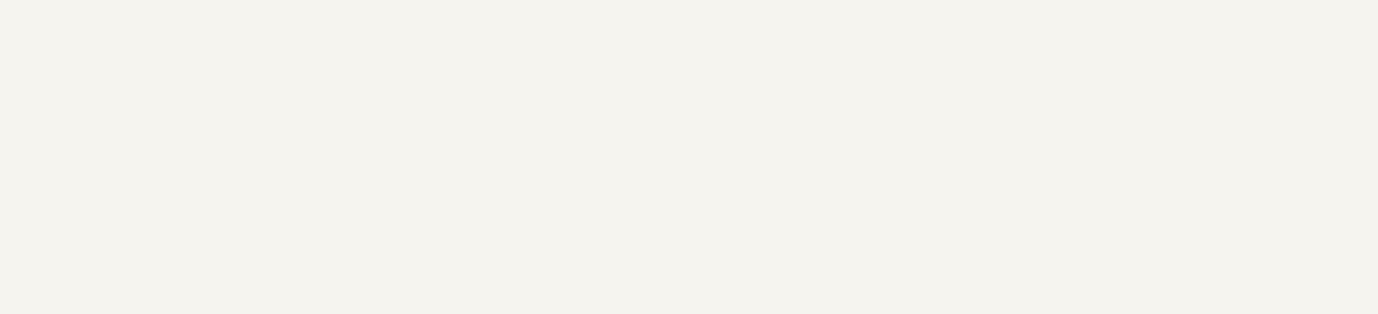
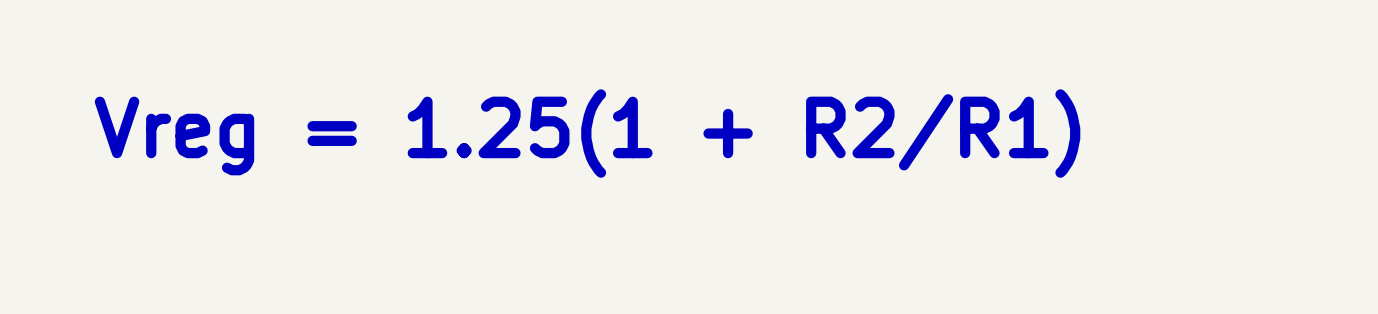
text: none -> Vreg = 1.25(1 + R2/R1) (587, 133)

